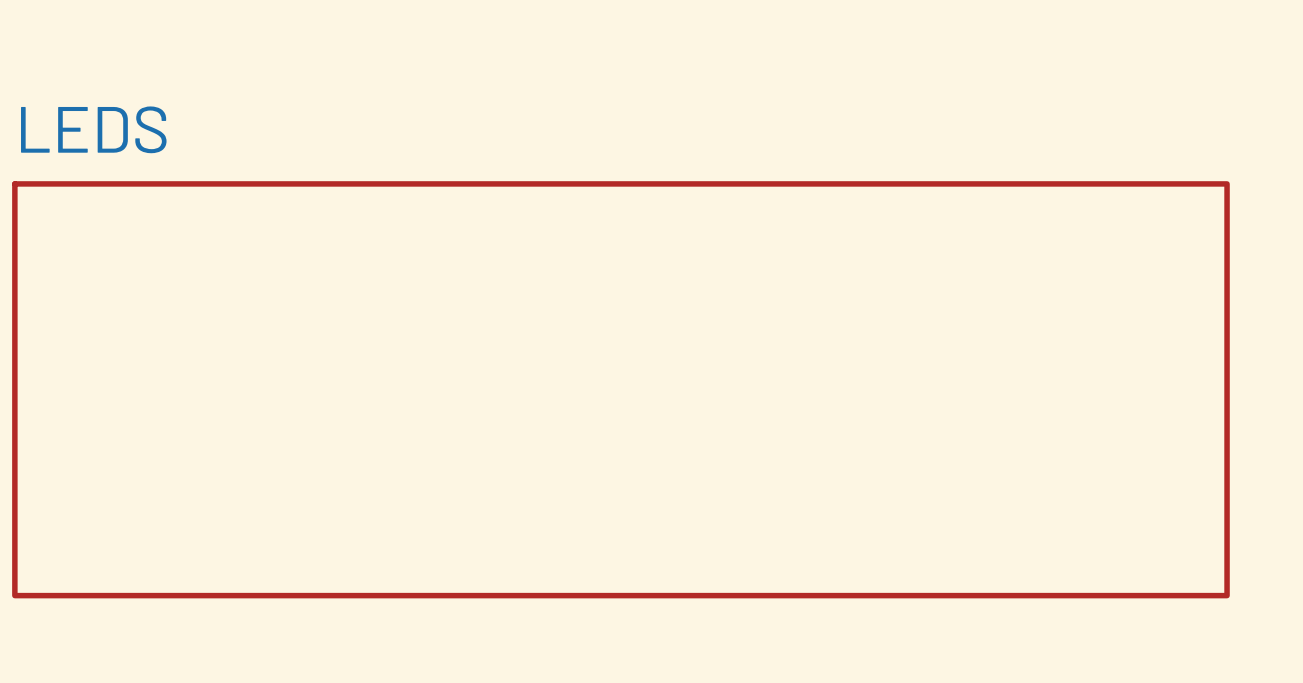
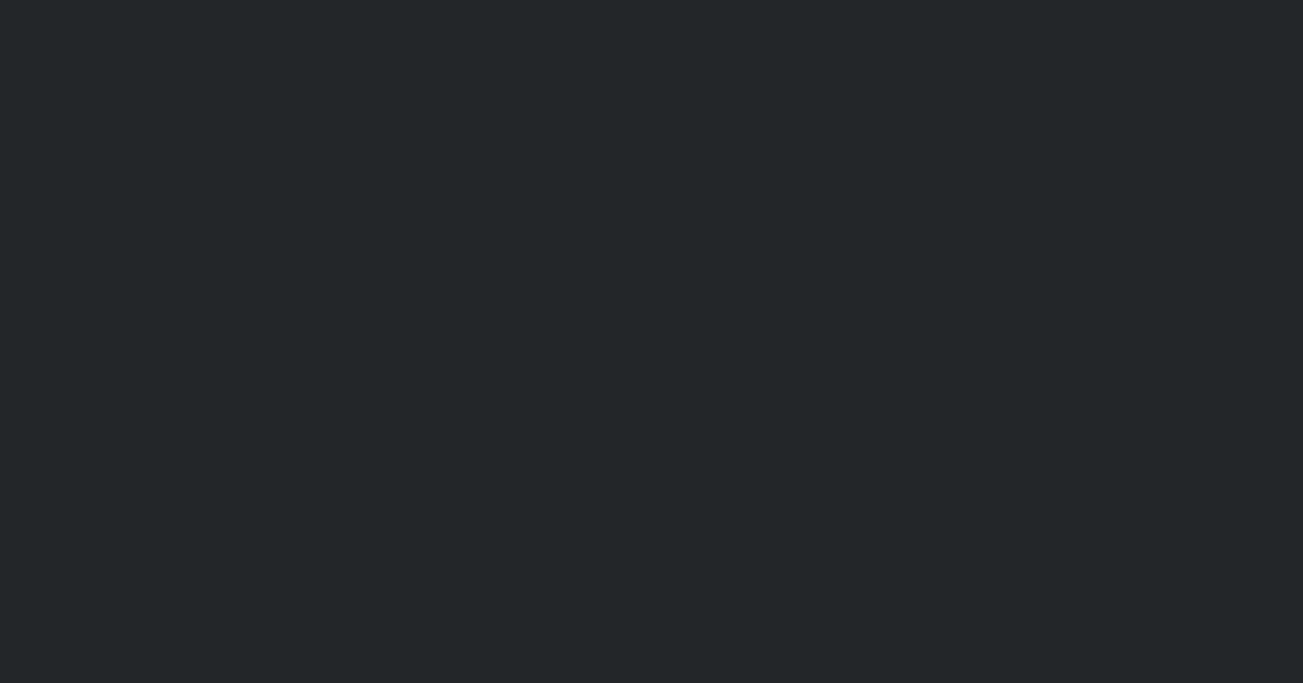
sheet LEDS: (620, 389) -> none

